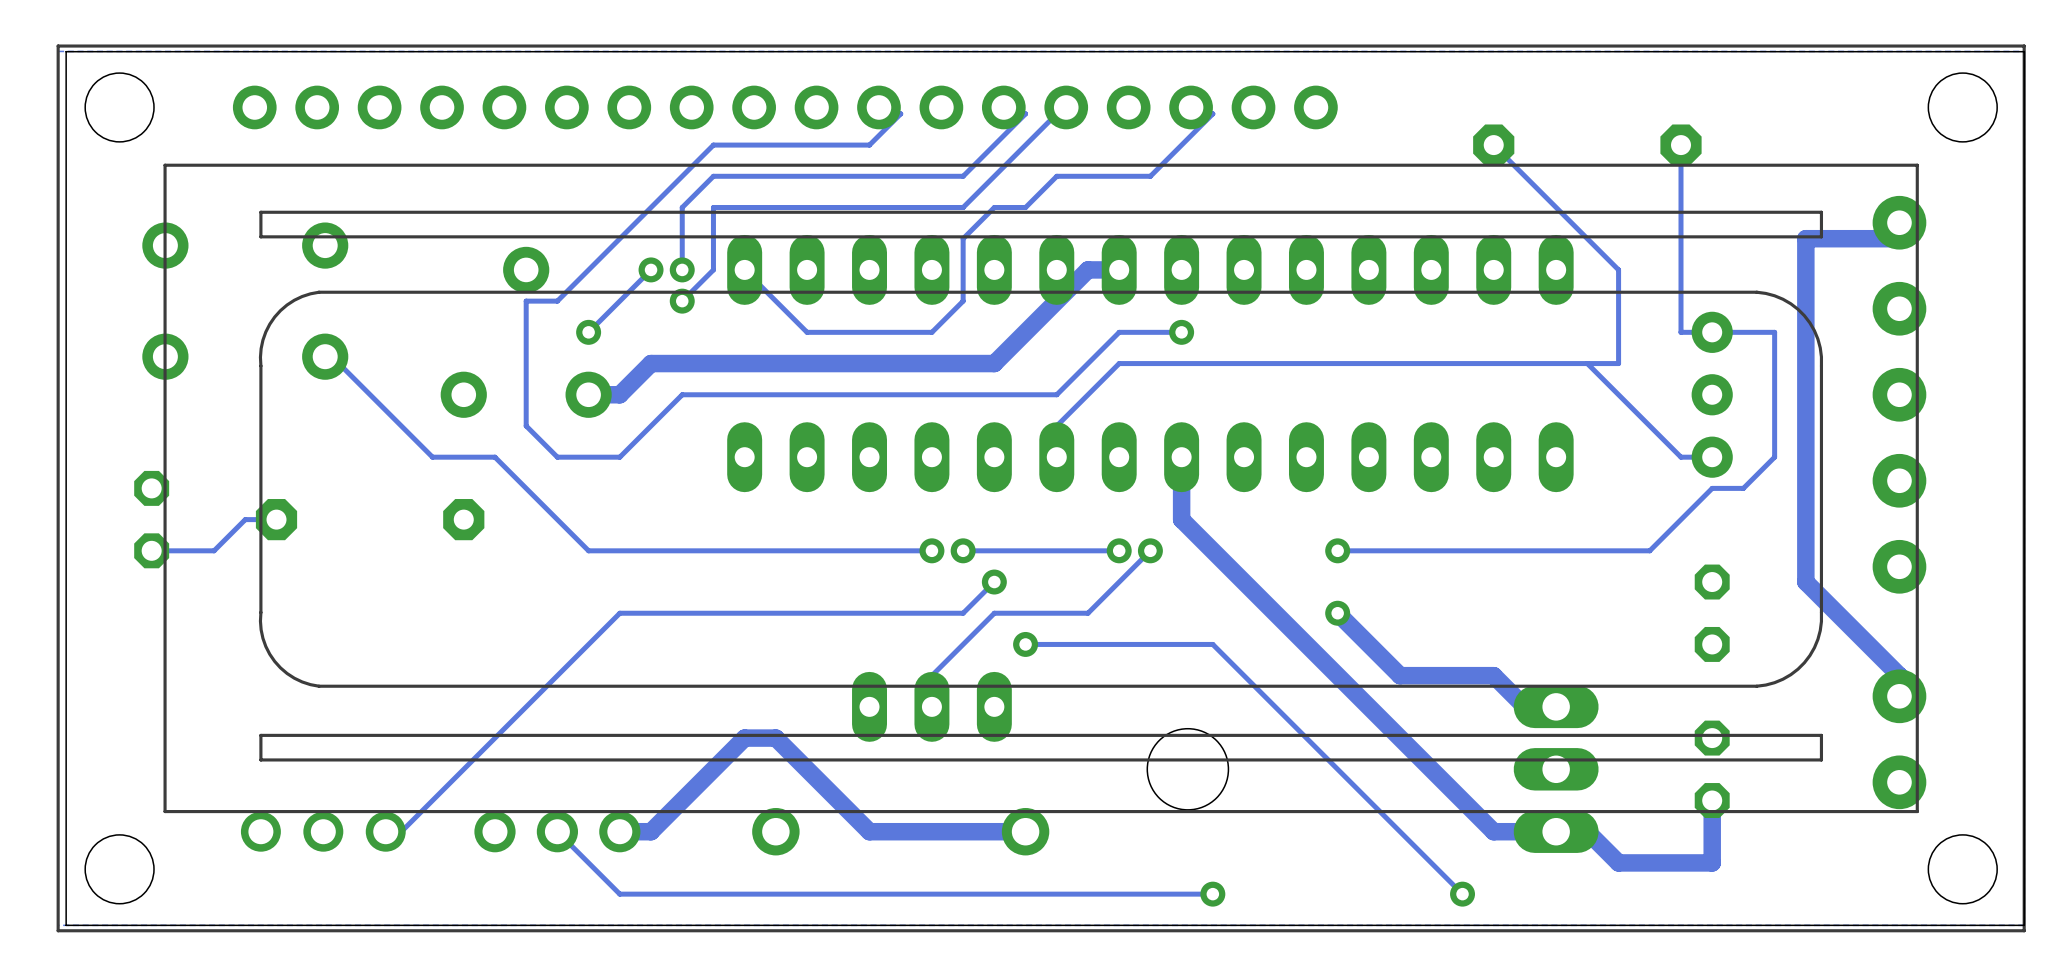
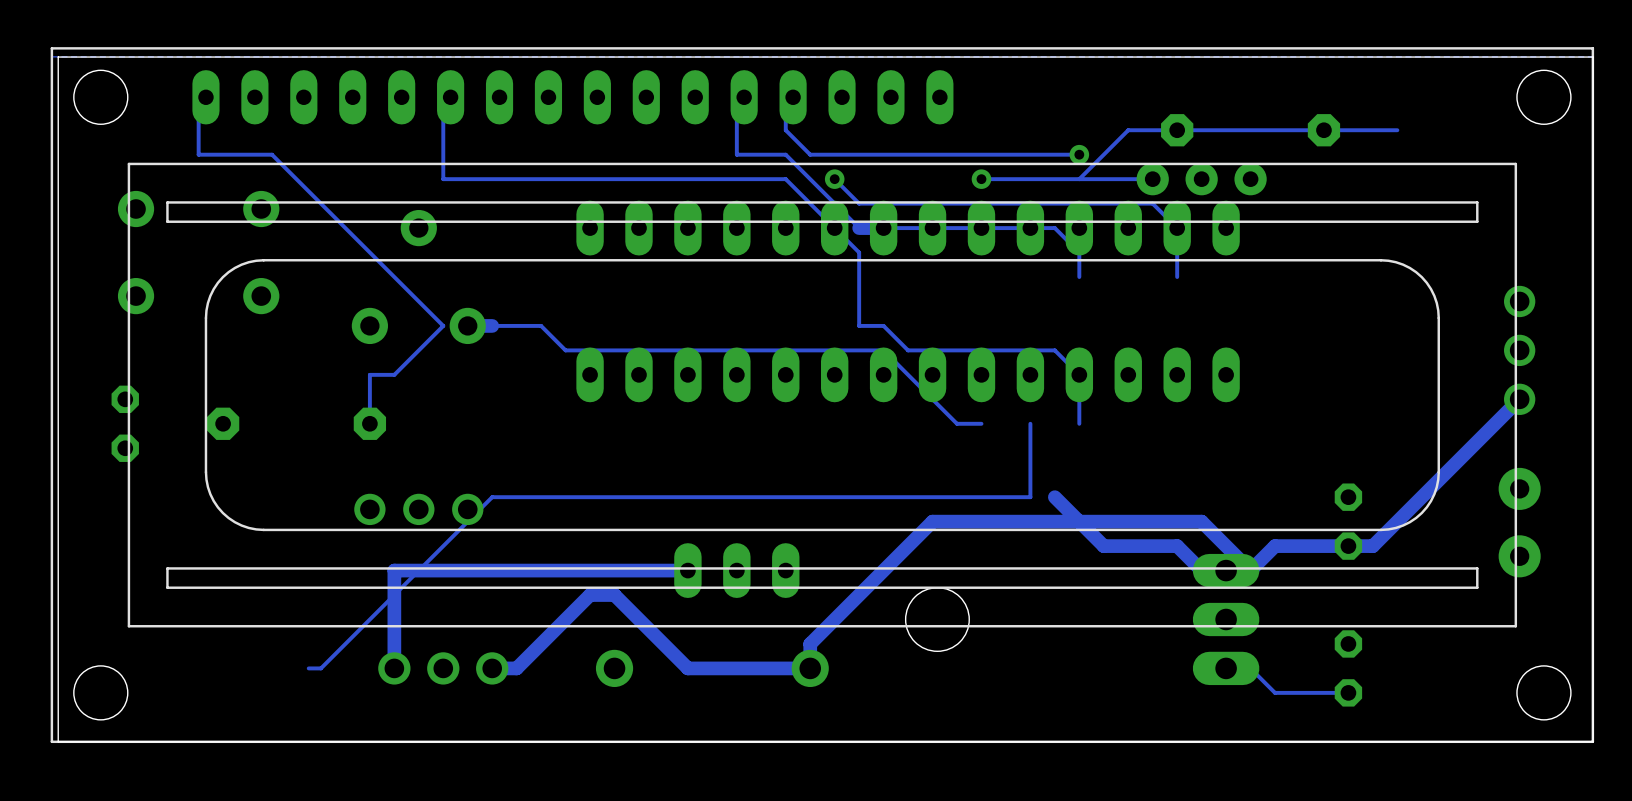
part footprint: [56, 44, 2026, 933] -> [50, 47, 1595, 744]
track: (878, 107) (900, 113) (869, 145) (713, 145) (557, 301) (526, 301) (526, 425) (557, 457) (619, 457) (682, 394) (1056, 394) (1119, 332) (1181, 332) -> none
track: (1003, 107) (1025, 113) (963, 176) -> (859, 228) (785, 154) (761, 154)
track: (1066, 107) (1056, 113) (963, 207) -> (1079, 423) (1079, 374) (1054, 350) (908, 350) (883, 325) (859, 325) (859, 252) (785, 179) (761, 179)
track: (1191, 107) (1212, 113) (1150, 176) -> (1079, 154) (908, 154)
track: (1493, 145) (1618, 269) (1618, 363) (1119, 363) (1056, 425) (1056, 457) -> none
track: (1681, 145) (1681, 332) (1774, 332) (1774, 457) (1743, 488) (1712, 488) (1649, 550) (1337, 550) -> none
track: none -> (1397, 130) (1128, 130) (1079, 179)
track: (931, 176) (713, 176) (682, 207) (682, 269) -> (736, 154) (736, 105) (744, 97)
track: (1056, 176) (1025, 207) (994, 207) (963, 238) (963, 301) (931, 332) (807, 332) (744, 269) -> (834, 154) (810, 154) (785, 130) (785, 105) (793, 97)
via: none -> (1079, 154)
track: (713, 207) (713, 269) (682, 301) -> (565, 179) (443, 179) (443, 105) (450, 97)
track: none -> (834, 179) (859, 203) (1152, 203) (1177, 228) (1177, 277)
via: none -> (834, 179)
via: none -> (981, 179)
track: none -> (1152, 179) (981, 179)
track: (1899, 222) (1899, 238) (1805, 238) (1805, 582) (1899, 675) (1899, 696) -> none
track: (651, 269) (588, 332) -> none
via: (651, 269) -> none
via: (682, 269) -> none
track: (1087, 269) (994, 363) (651, 363) (619, 394) -> (981, 423) (957, 423) (883, 350) (565, 350) (541, 325) (492, 325)
track: none -> (883, 228) (1054, 228) (1079, 252) (1079, 277)
via: (682, 301) -> none
via: (588, 332) -> none
via: (1181, 332) -> none
track: (325, 356) (338, 363) (432, 457) (463, 457) -> (369, 423) (369, 374)
track: (1587, 363) (1681, 457) (1712, 457) -> none
part rotation: 0° (1712, 394) -> 90° clockwise (1201, 179)
part position: (1712, 394) -> (1201, 179)
part: (1899, 394) -> none
part: none -> (1519, 350)
track: (494, 457) (588, 550) (931, 550) -> (394, 374) (443, 325) (272, 154) (198, 154) (198, 105) (205, 97)
track: (1181, 457) (1181, 519) (1493, 831) (1556, 831) -> none
track: (276, 519) (245, 519) (214, 550) (151, 550) -> none
via: (931, 550) -> none
via: (963, 550) -> none
track: (1119, 550) (963, 550) -> none
via: (1119, 550) -> none
track: (1150, 550) (1087, 613) -> (1030, 423) (1030, 497) (859, 497)
via: (1150, 550) -> none
via: (1337, 550) -> none
track: (994, 582) (963, 613) -> (785, 497) (761, 497)
via: (994, 582) -> none
track: (994, 613) (931, 675) (931, 706) -> none
via: (1337, 613) -> none
part position: (1712, 613) -> (1348, 521)
via: (1025, 644) -> none
track: (1181, 644) (1025, 644) -> (932, 521) (810, 643) (810, 668)
track: (1212, 644) (1462, 894) -> (957, 521) (1201, 521) (1250, 570) (1275, 546) (1372, 546) (1519, 399)
track width: thin (1212, 644) (1181, 644) -> thick (957, 521) (932, 521)
track: none -> (687, 570) (394, 570) (394, 668)
part position: (1899, 739) -> (1519, 522)
part: (1712, 769) -> none
track: (1712, 800) (1712, 862) -> none
part position: (323, 831) -> (418, 509)
track: (557, 831) (619, 894) (1212, 894) -> none
track width: thick (1556, 831) (1587, 831) (1618, 862) (1712, 862) -> thin (1226, 668) (1250, 668) (1275, 692) (1348, 692)
part: none -> (1348, 668)
via: (1212, 894) -> none
via: (1462, 894) -> none

